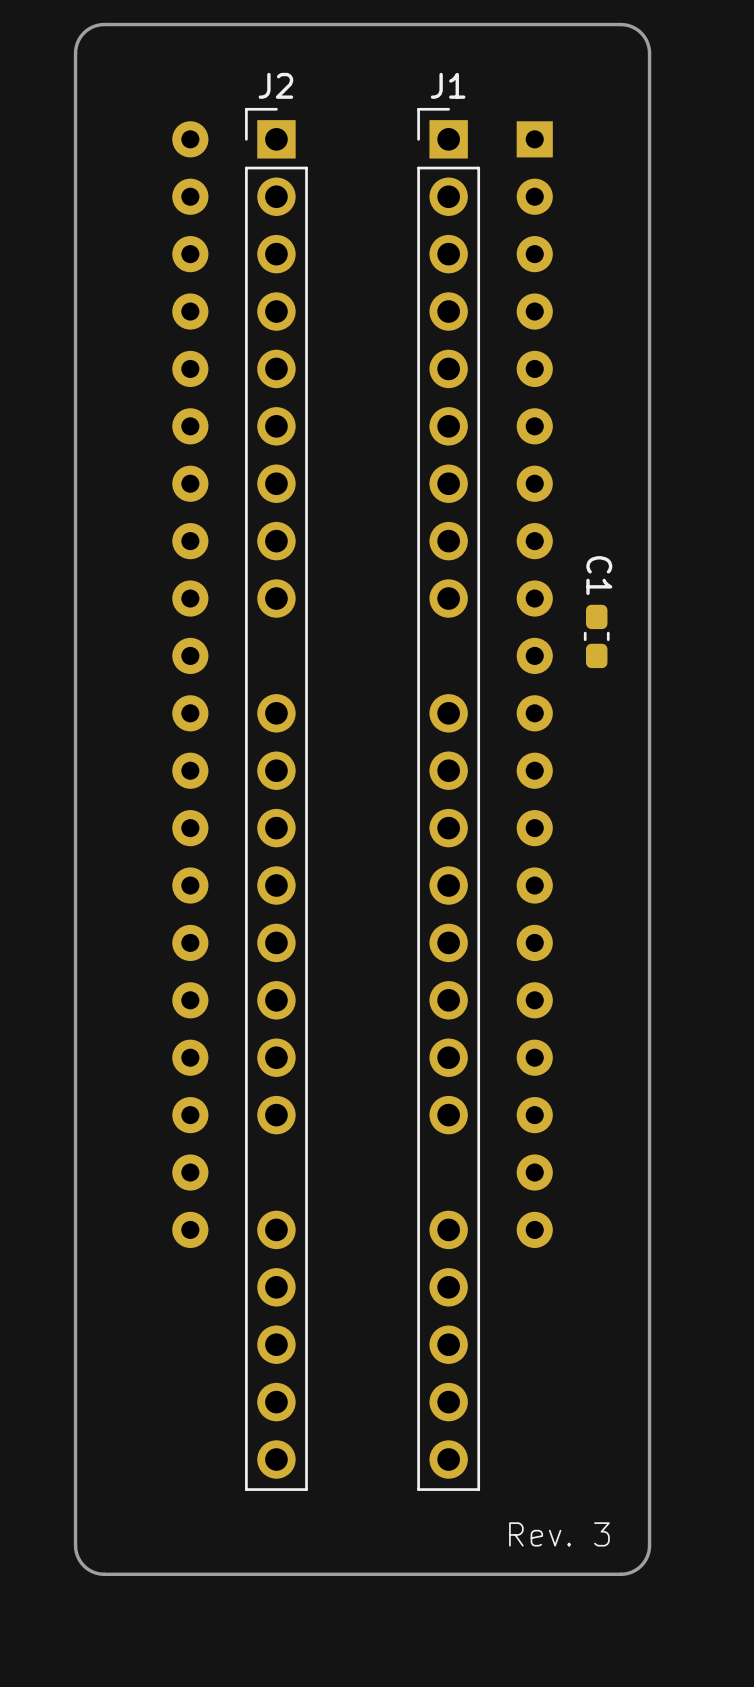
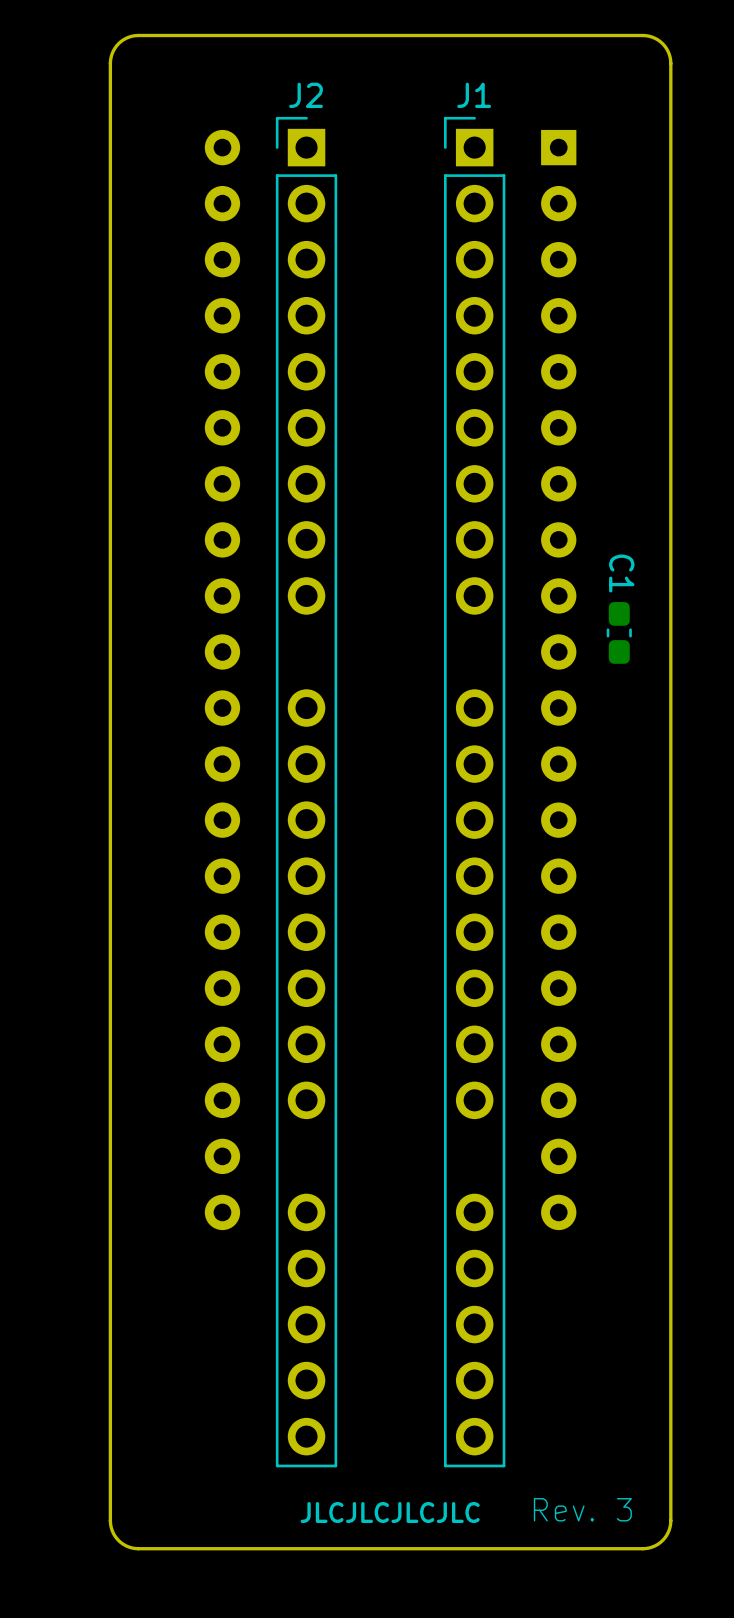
text: none -> JLCJLCJLCJLC (390, 1512)

